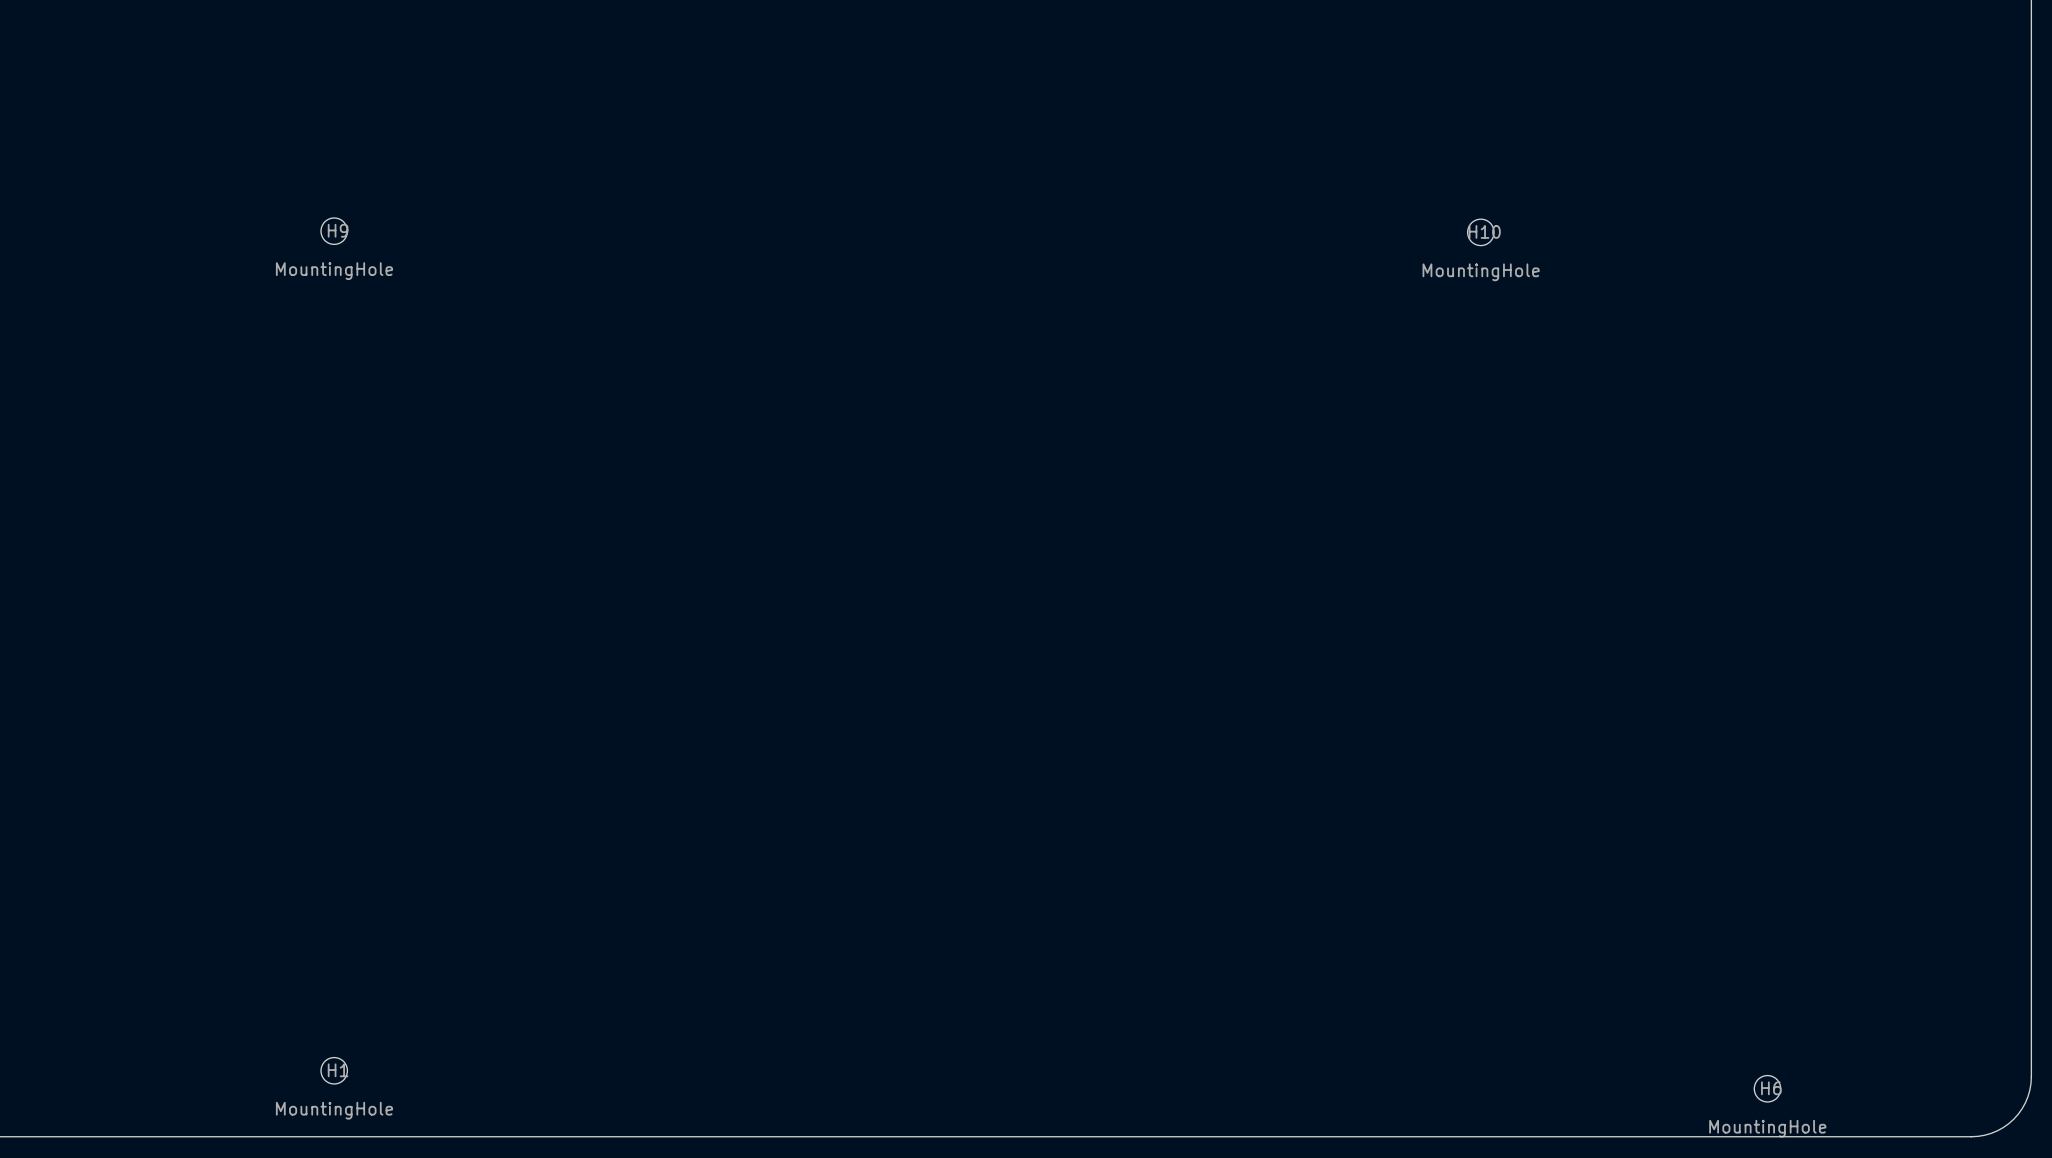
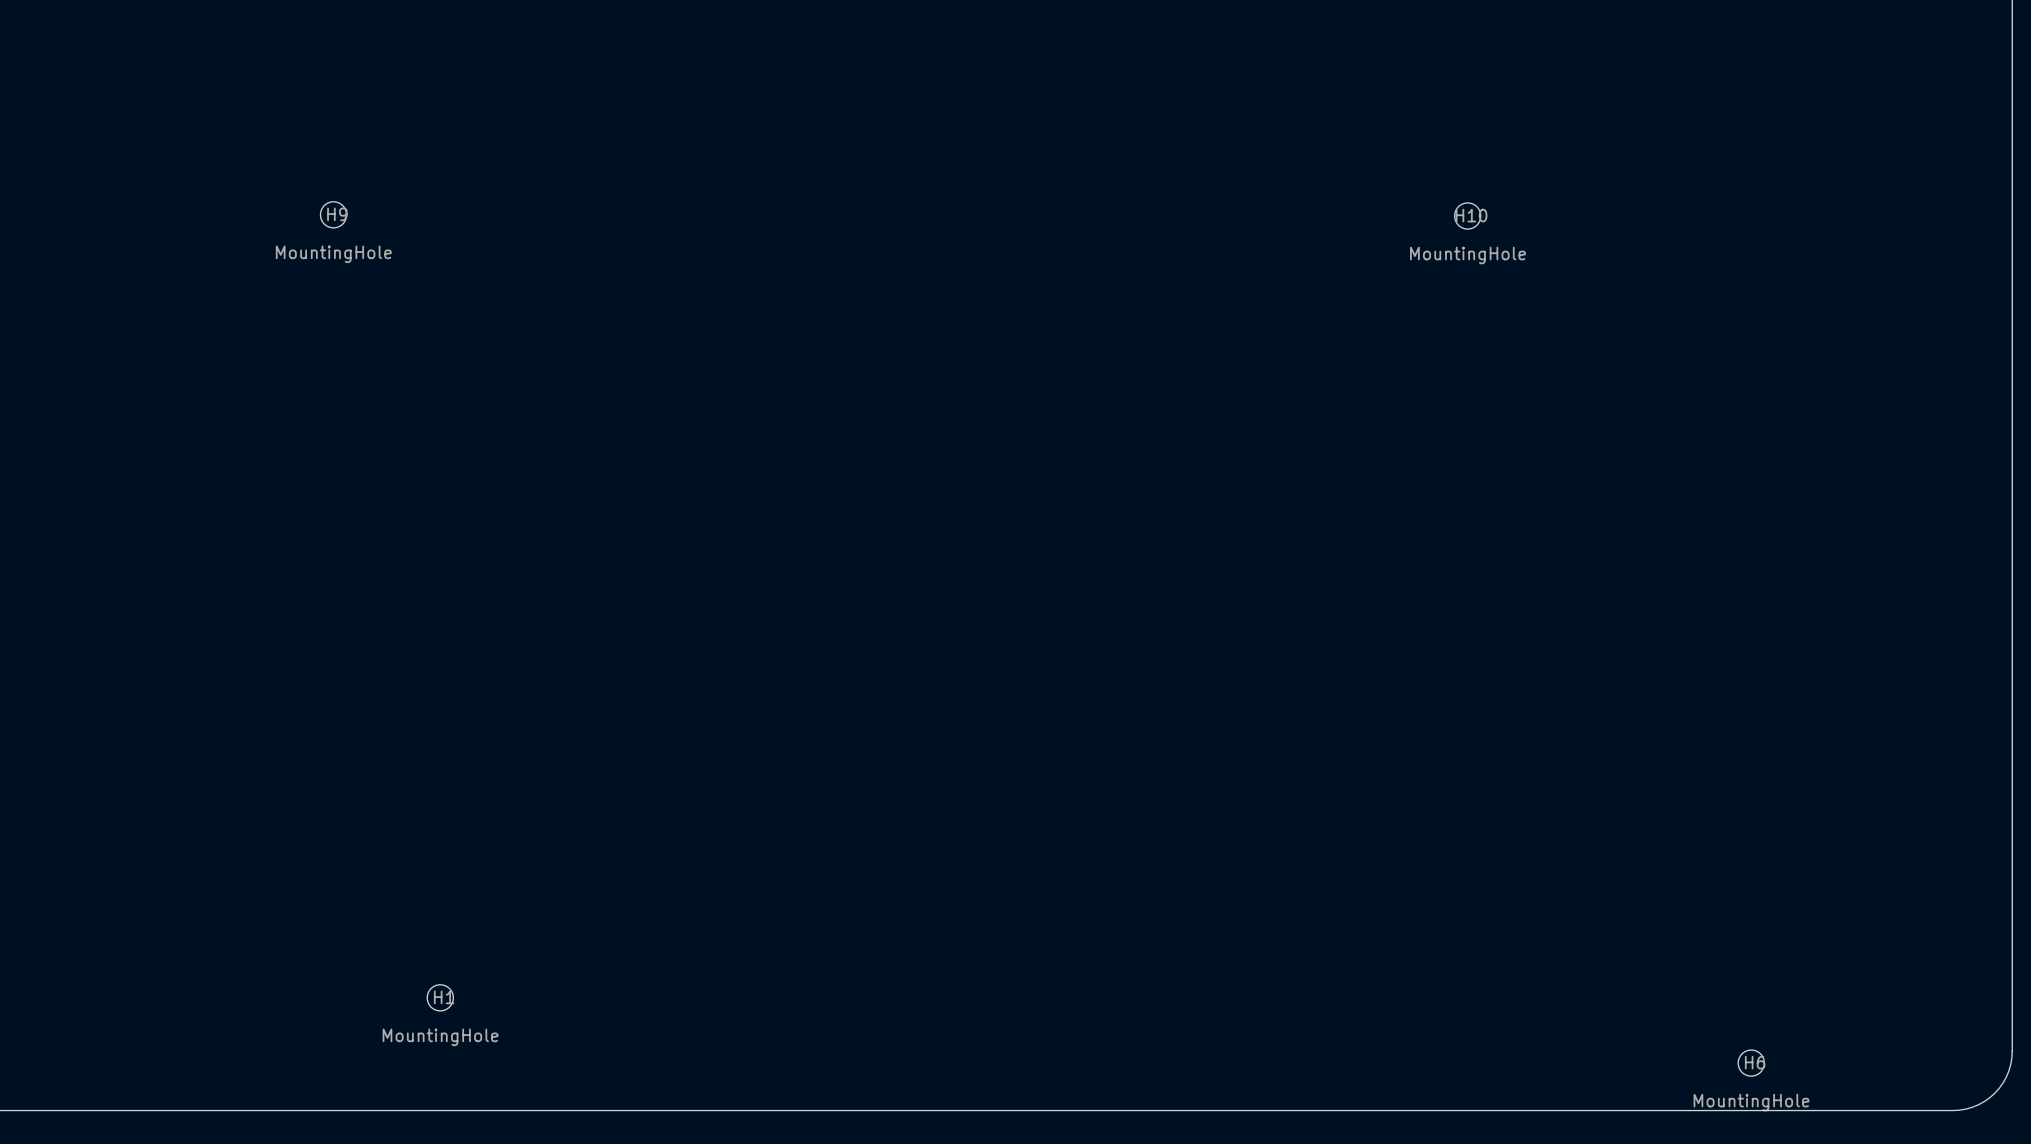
H1 position: (334, 1070) -> (440, 997)

